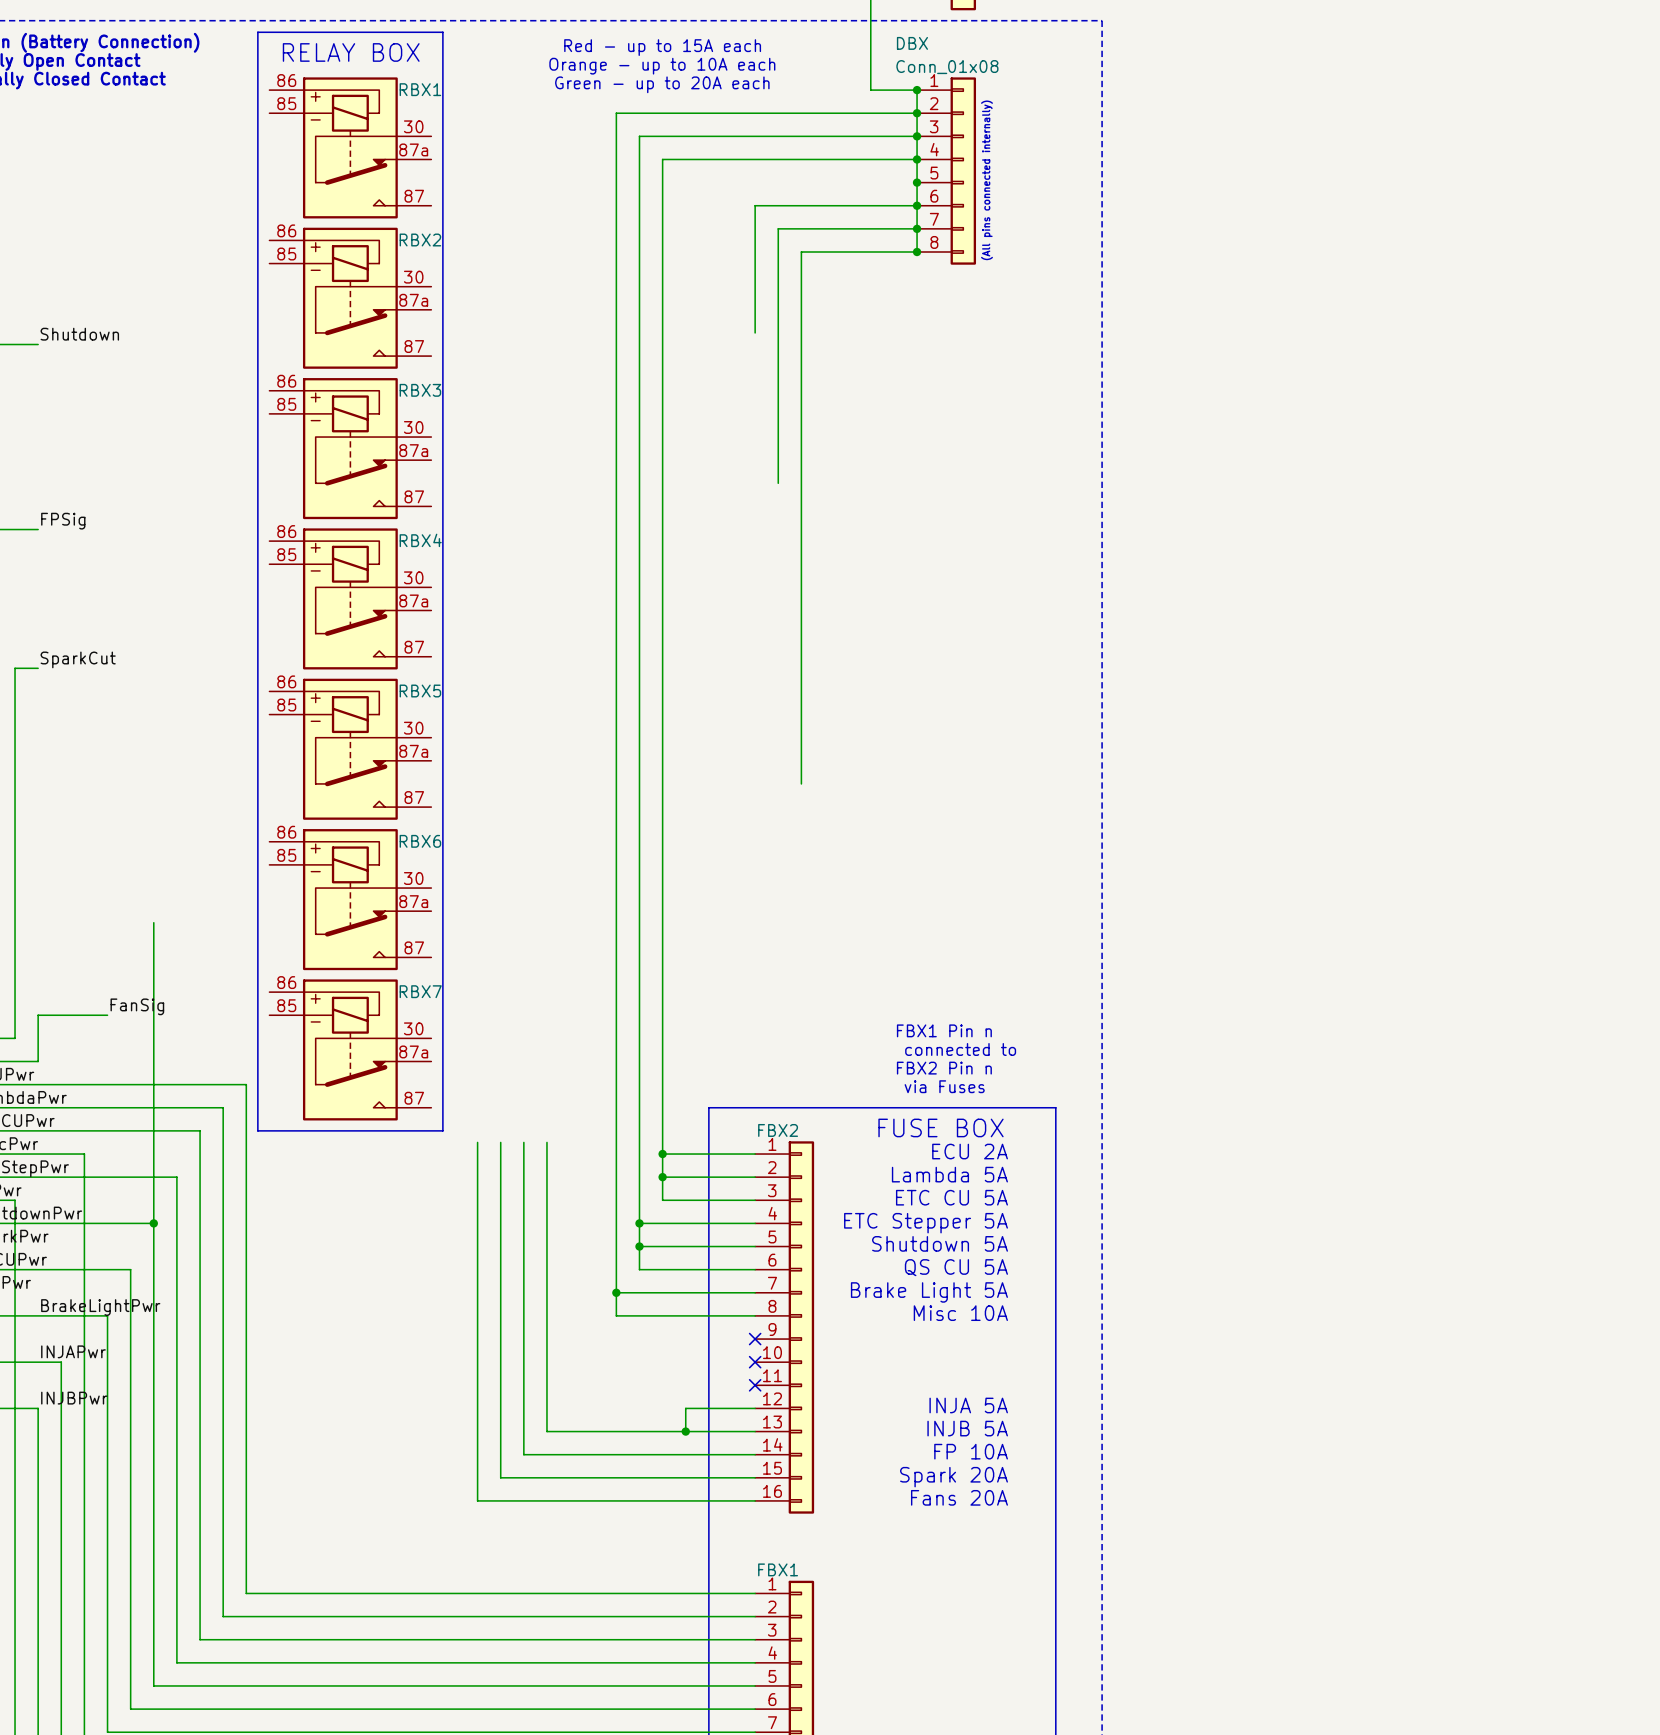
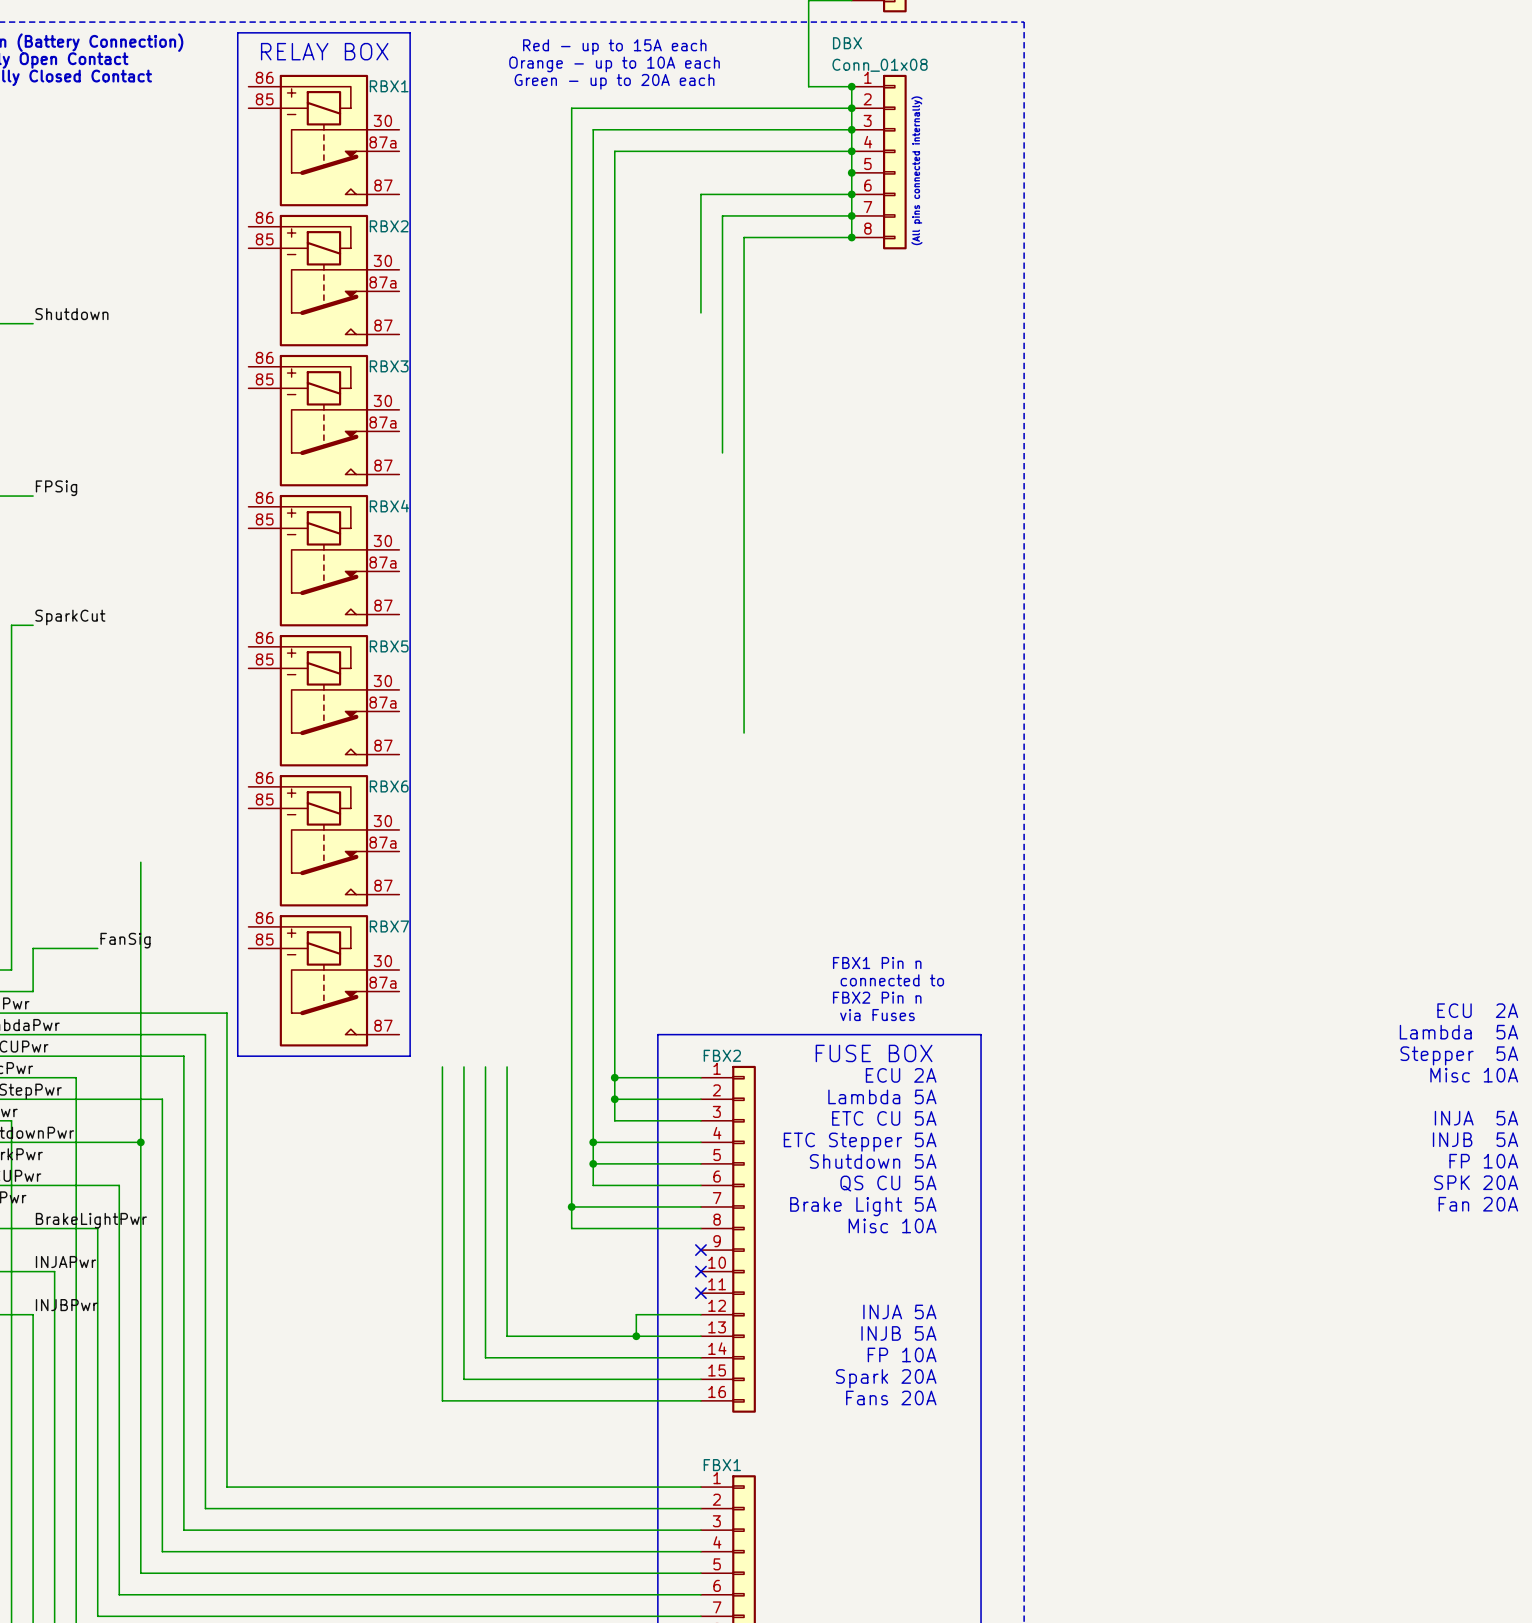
text: none -> ECU 2A (1477, 1010)
text: none -> Lambda 5A (1458, 1032)
text: none -> Stepper 5A (1459, 1055)
text: none -> Misc 10A (1474, 1075)
text: none -> INJA 5A (1476, 1118)
text: none -> INJB 5A (1475, 1139)
text: none -> FP 10A (1483, 1161)
text: none -> SPK 20A (1476, 1182)
text: none -> Fan 20A (1478, 1204)

